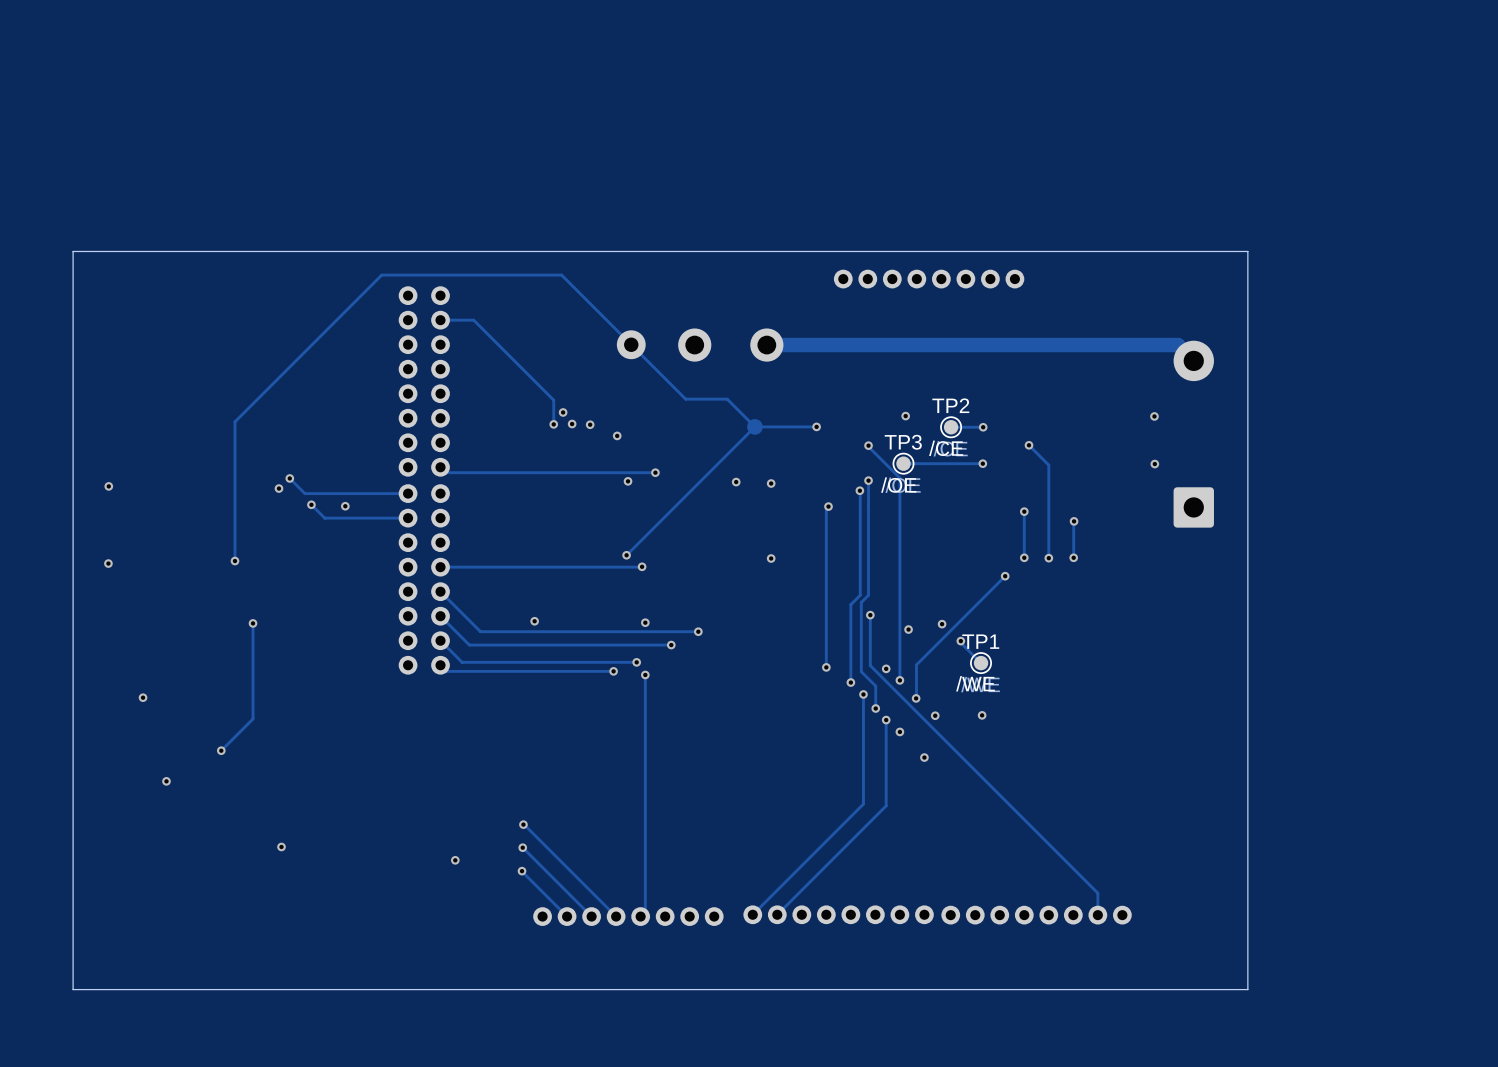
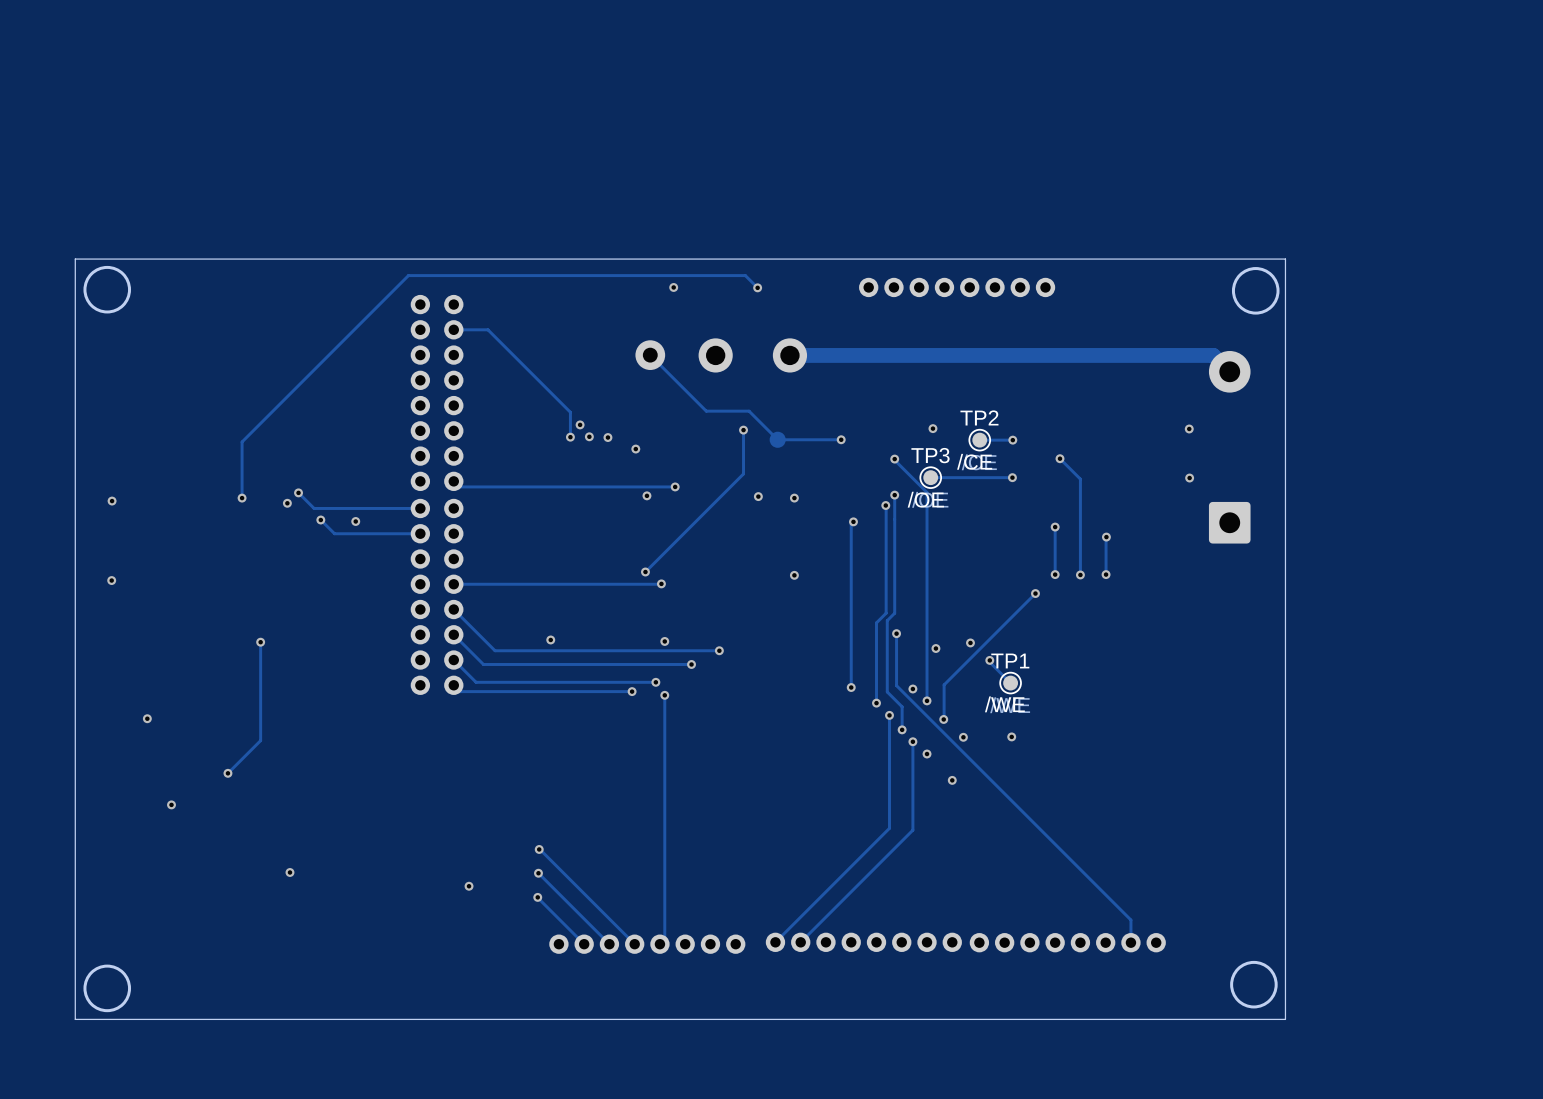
round board edge: none -> [83, 265, 132, 314]
round board edge: none -> [1231, 267, 1280, 315]
via: none -> (673, 287)
via: none -> (757, 287)
track: (631, 344) (561, 275) (381, 275) (234, 421) (234, 429) -> (757, 287) (745, 275) (408, 275) (242, 441)
via: none -> (743, 430)
track: (754, 426) (721, 460) -> (743, 430) (743, 473)
track: (234, 483) (234, 561) -> none
via position: (234, 561) -> (242, 498)
round board edge: none -> [1230, 960, 1278, 1009]
round board edge: none -> [83, 964, 132, 1013]

